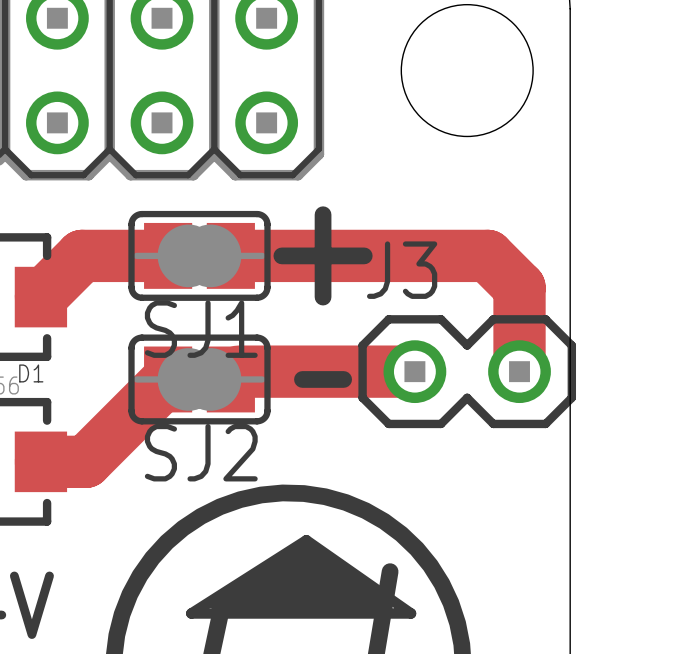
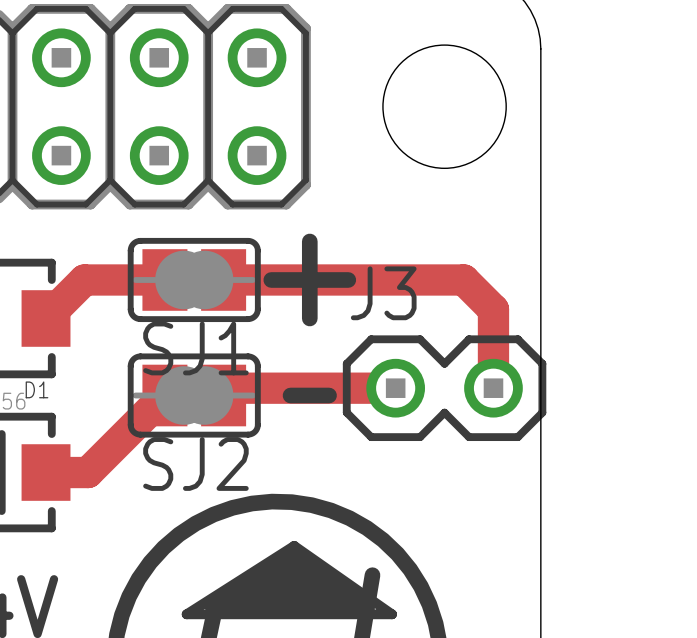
track width: thick (168, 255) (82, 255) (40, 297) -> thin (164, 279) (84, 279) (46, 318)
track width: thick (230, 255) (487, 255) (519, 287) (519, 371) -> thin (223, 279) (463, 279) (493, 309) (493, 388)
track width: thick (238, 371) (414, 371) -> thin (230, 388) (395, 388)
track width: thick (168, 379) (85, 461) (40, 461) -> thin (164, 395) (87, 472) (46, 472)

